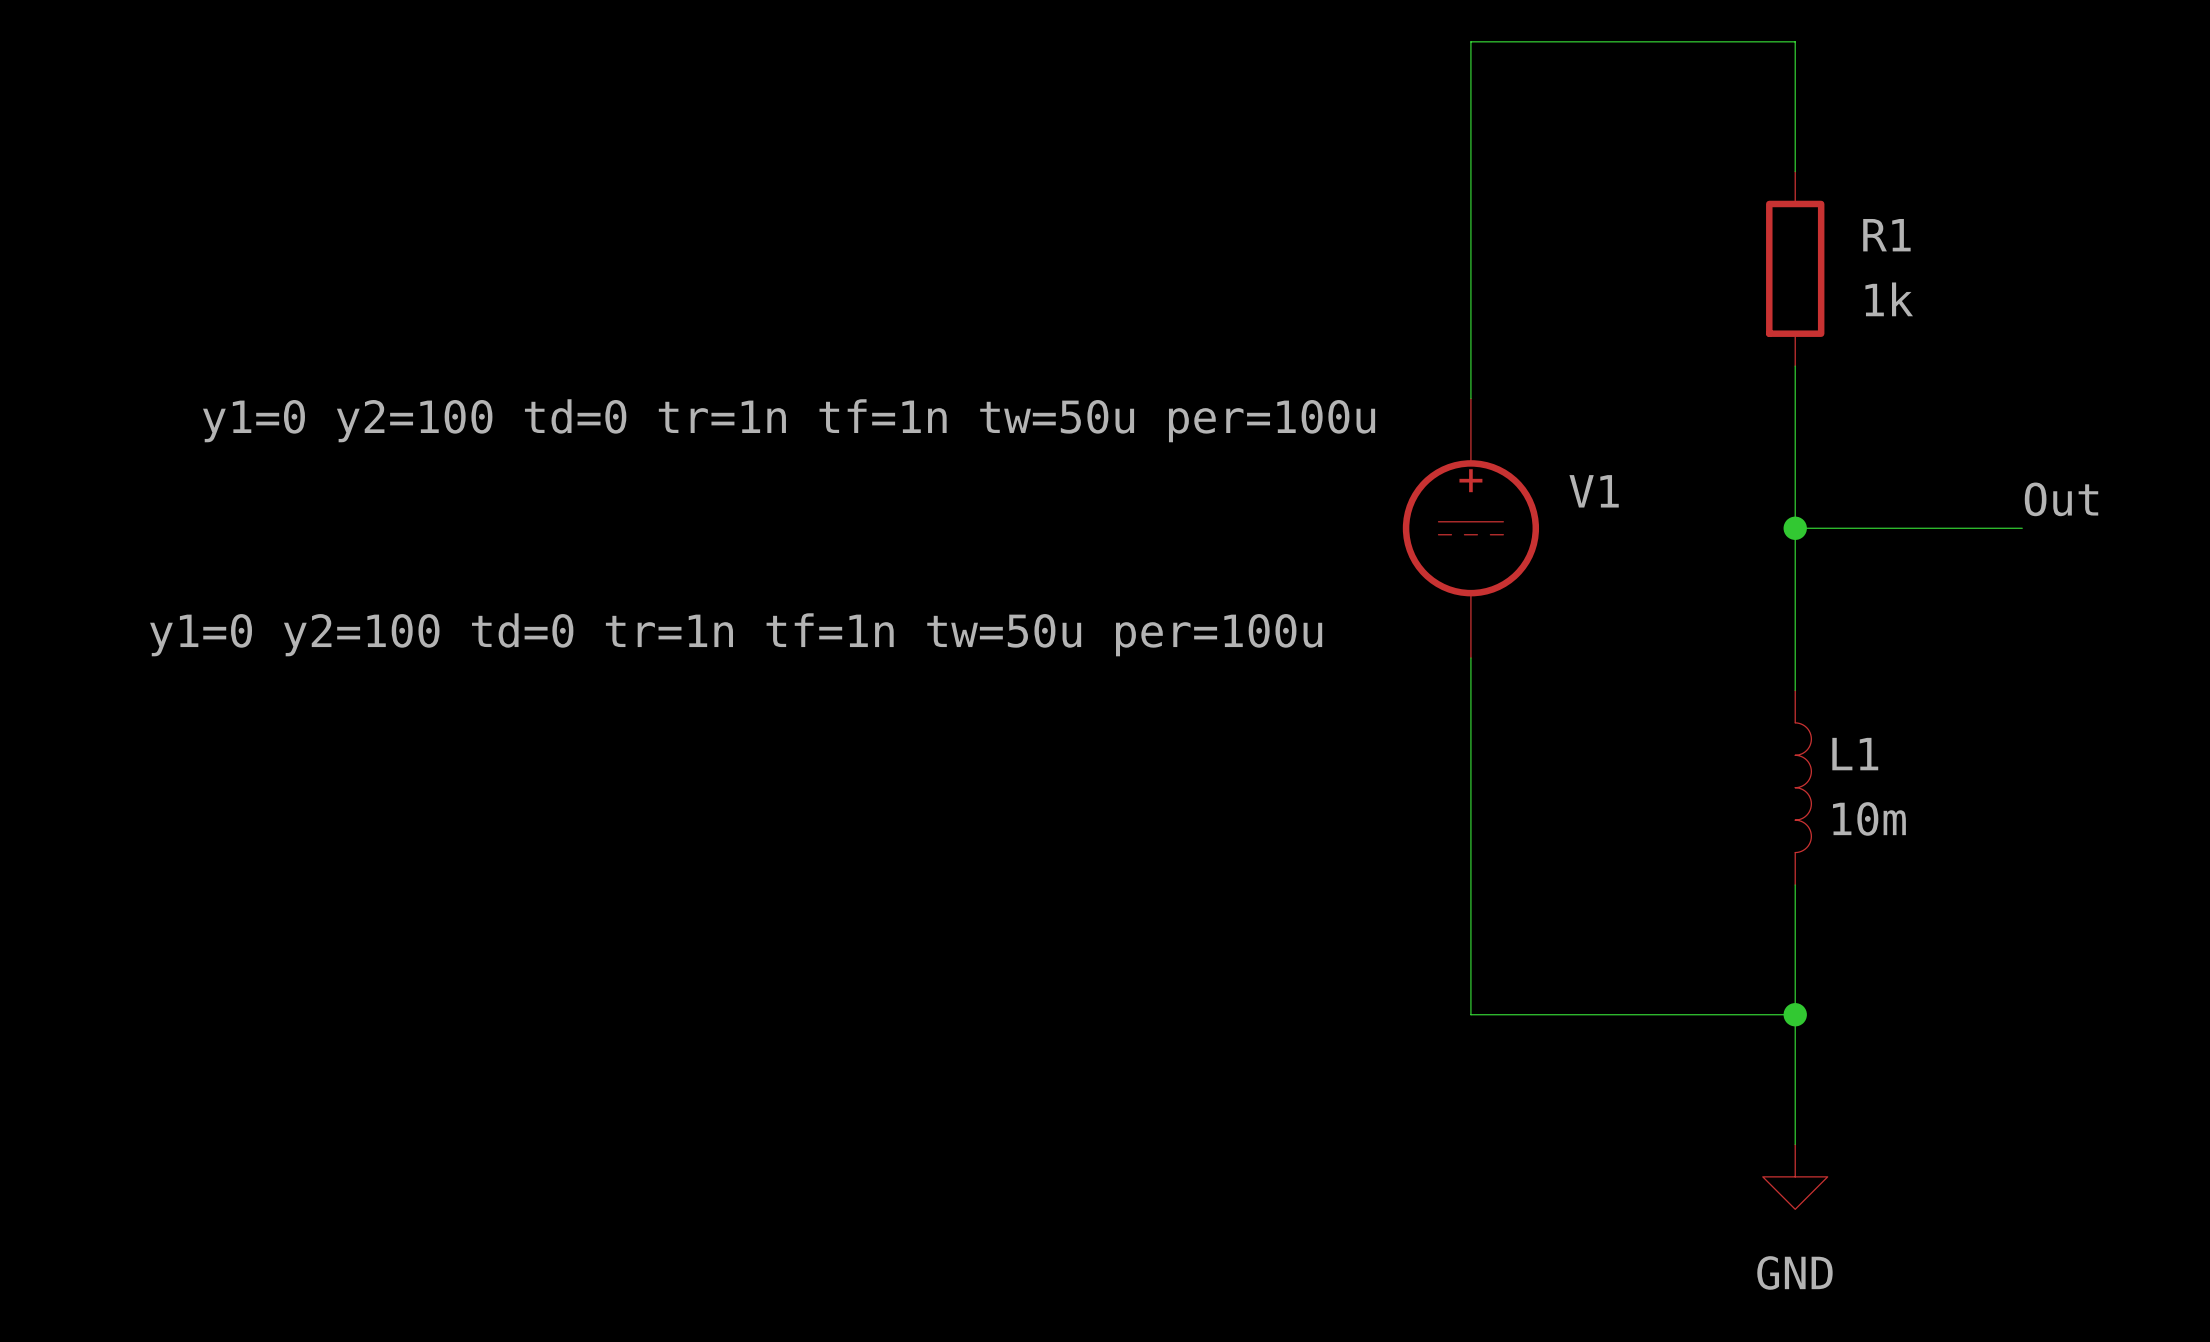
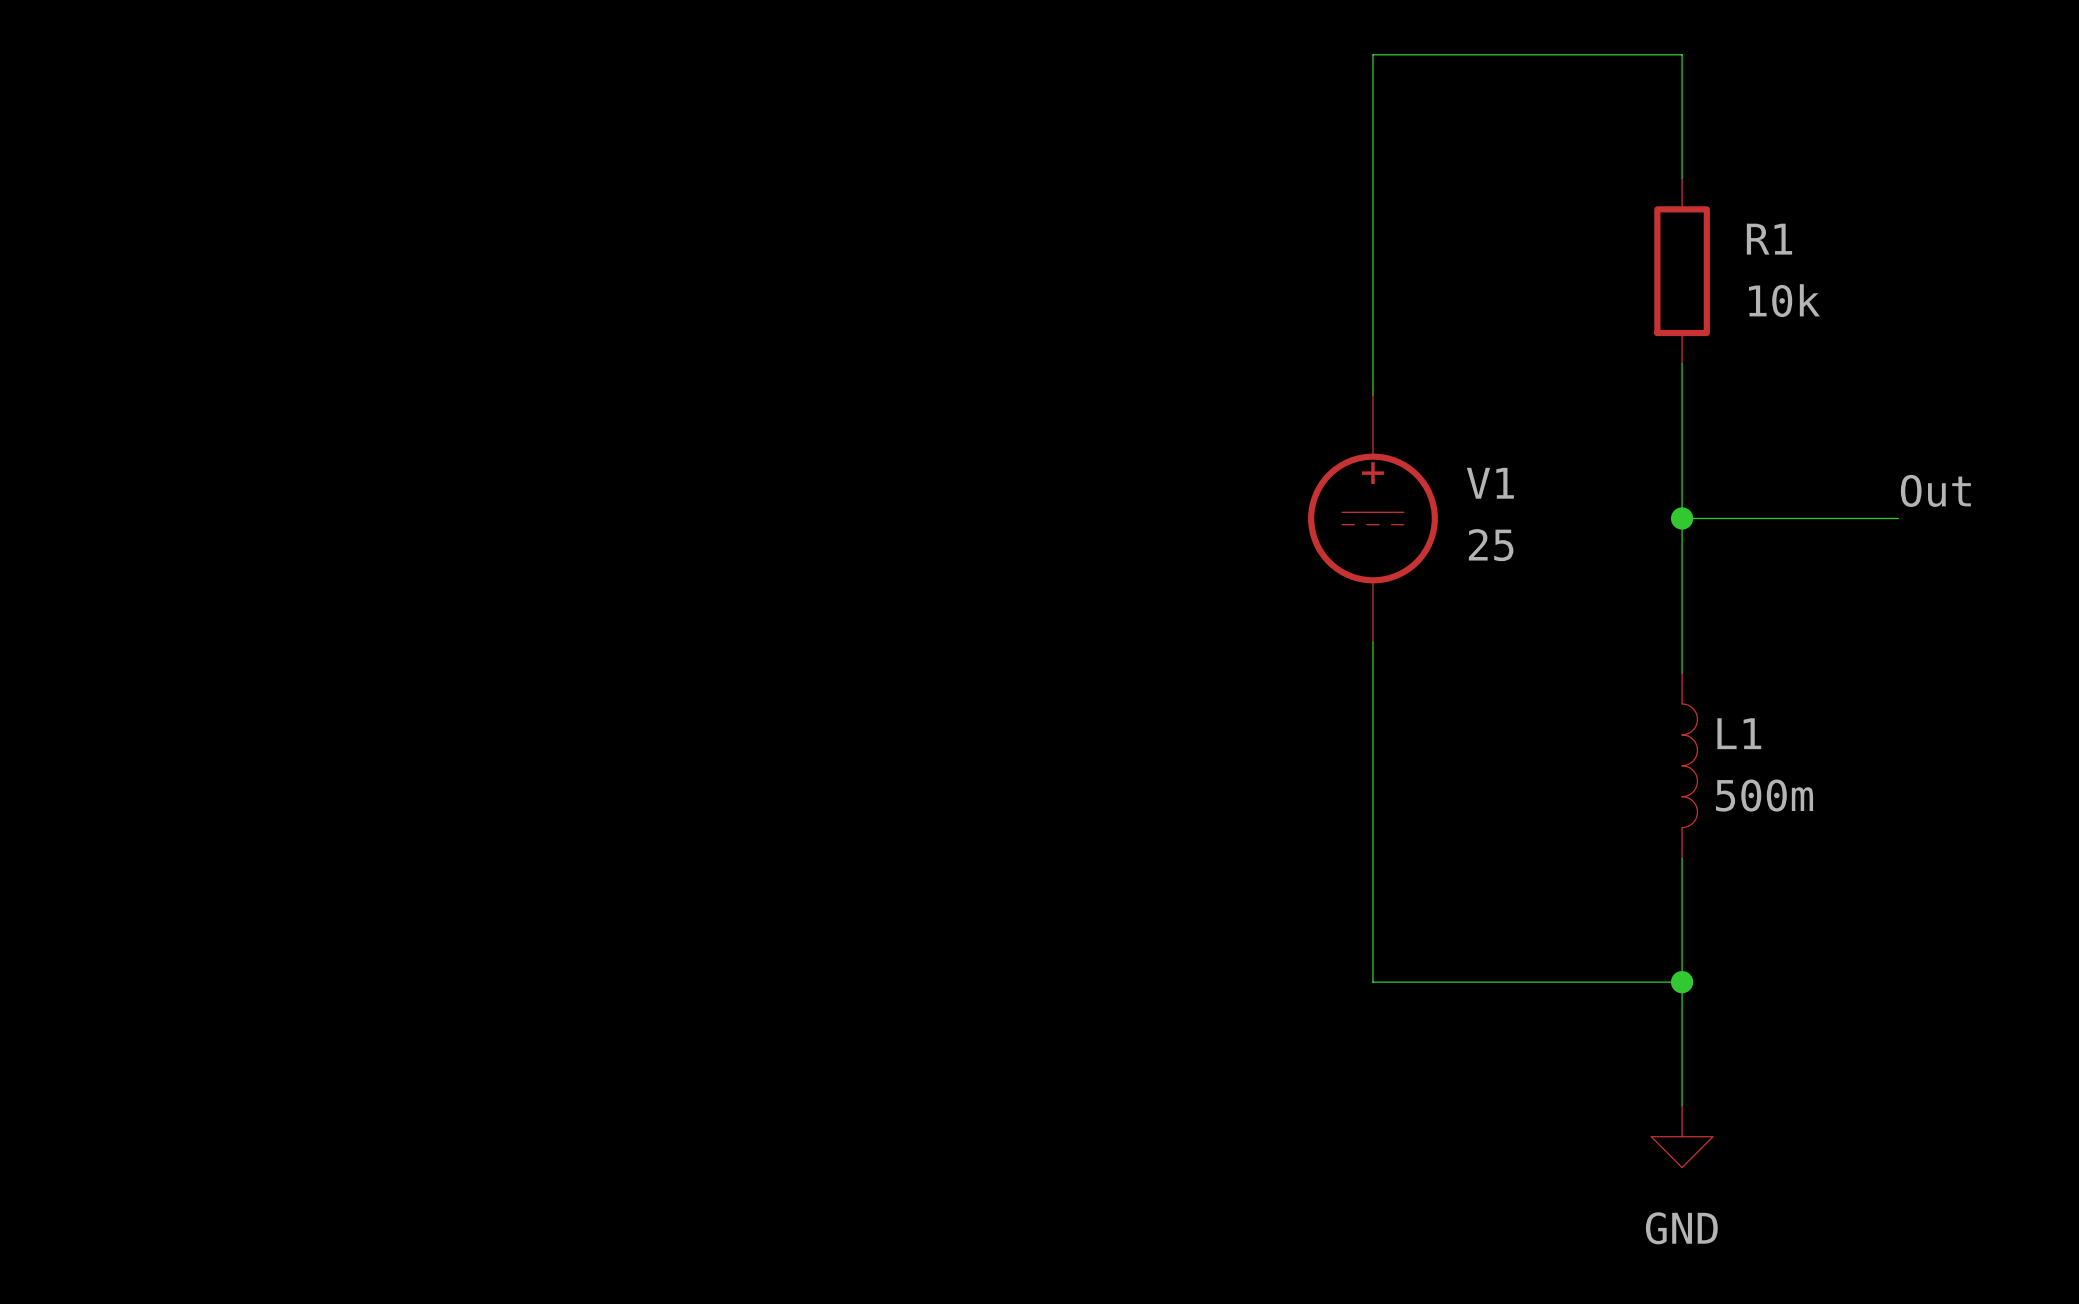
R1 value: 1k (1889, 299) -> 10k (1784, 300)
V1 text: y1=0 y2=100 td=0 tr=1n tf=1n tw=50u per=100u (789, 420) -> none
V1 value: y1=0 y2=100 td=0 tr=1n tf=1n tw=50u per=100u (736, 634) -> 25 (1491, 545)
L1 value: 10m (1869, 818) -> 500m (1764, 795)

